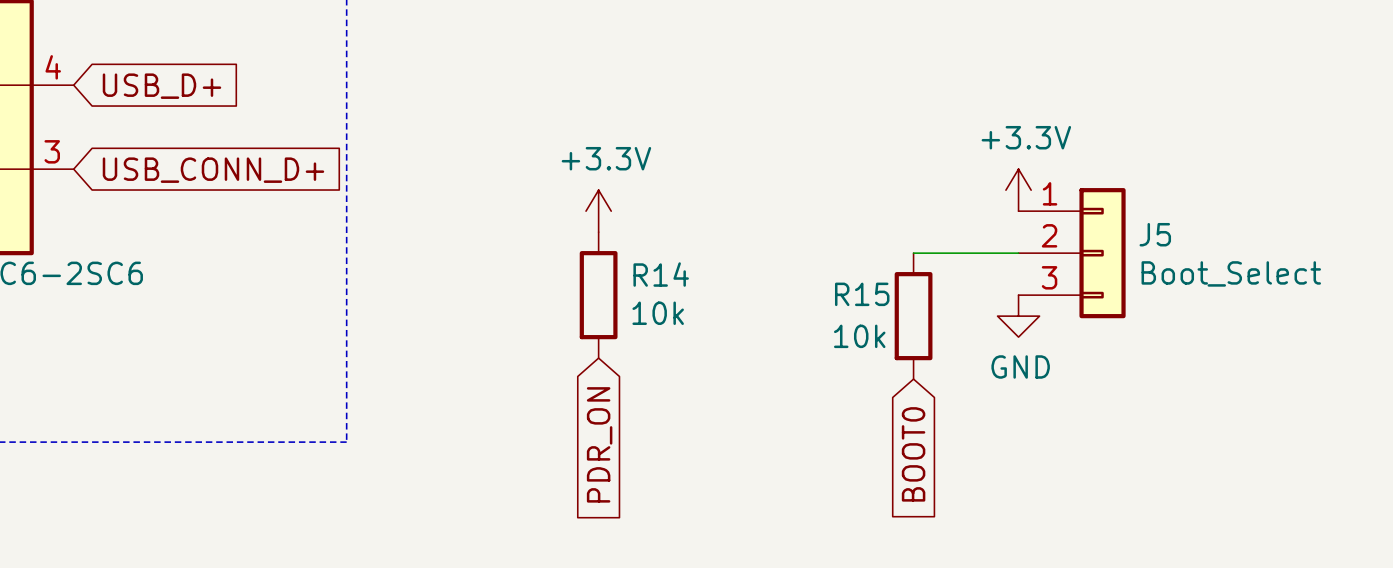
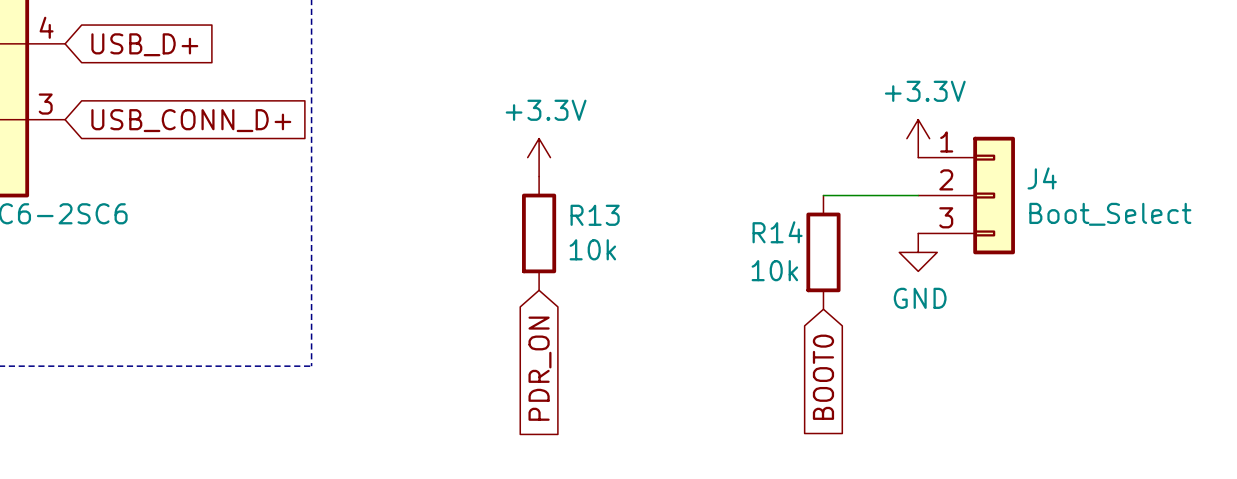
J5 name: J5 (1155, 234) -> J4 (1042, 178)
R14 name: R14 (661, 274) -> R13 (595, 215)
R15 name: R15 (862, 294) -> R14 (777, 232)

